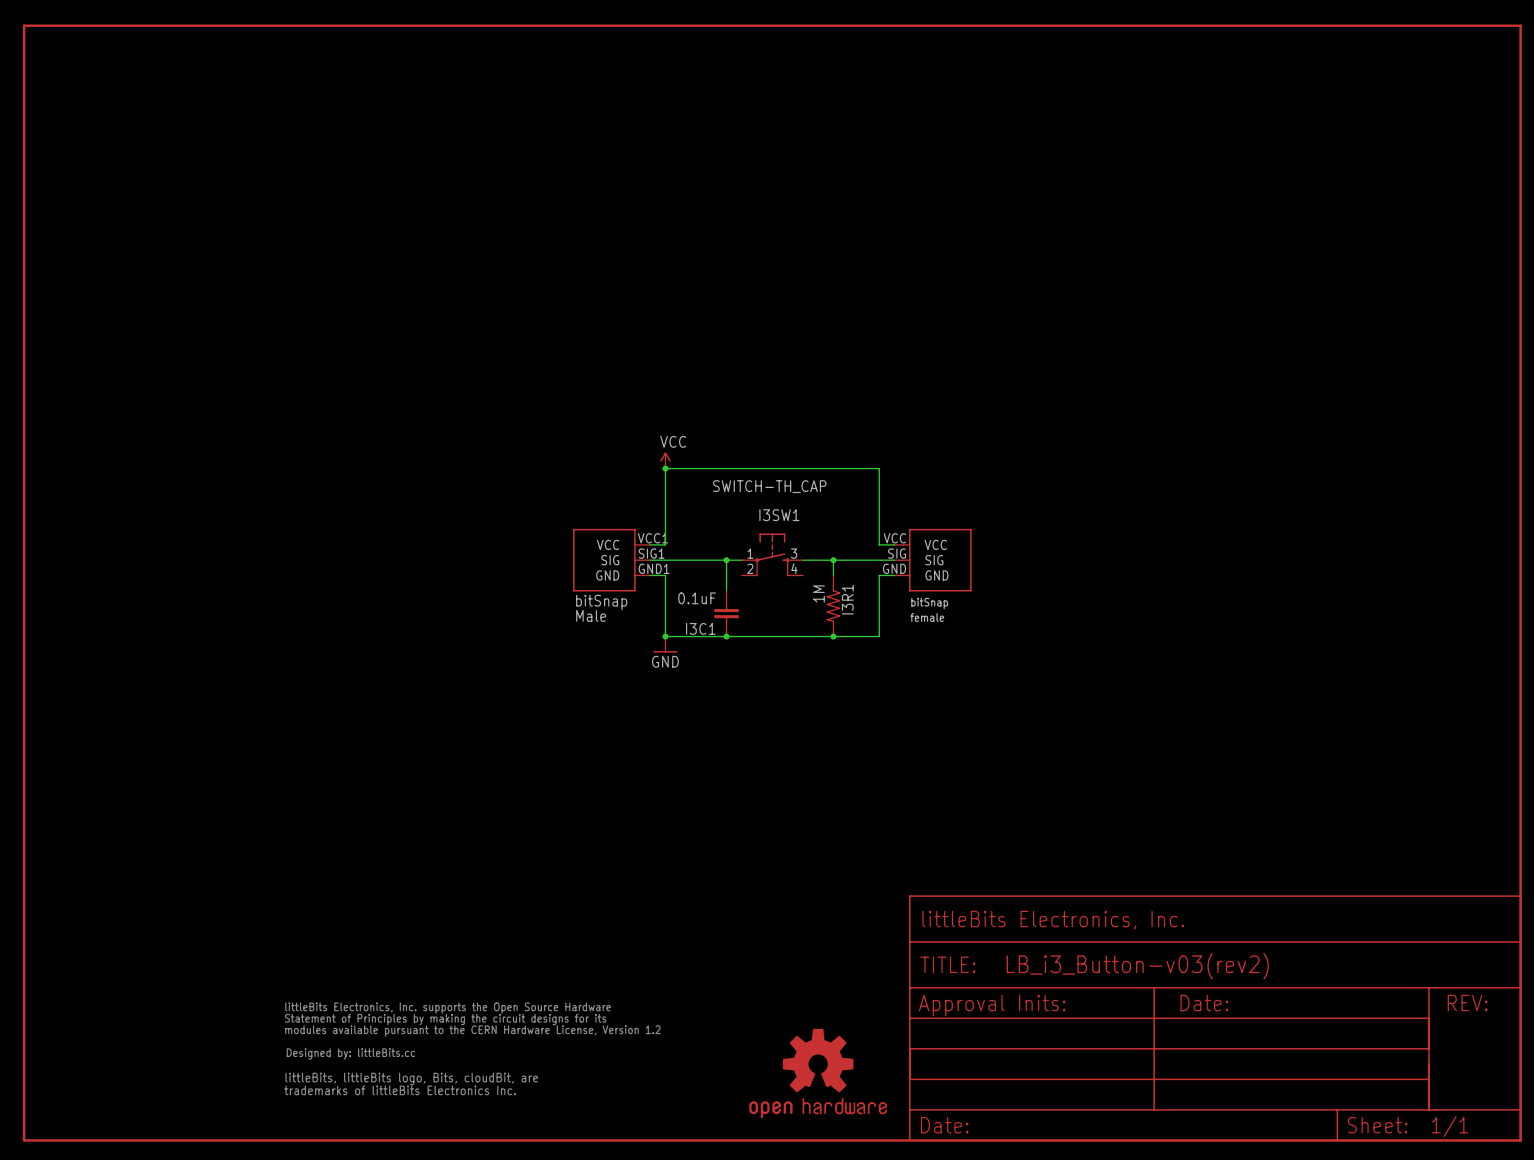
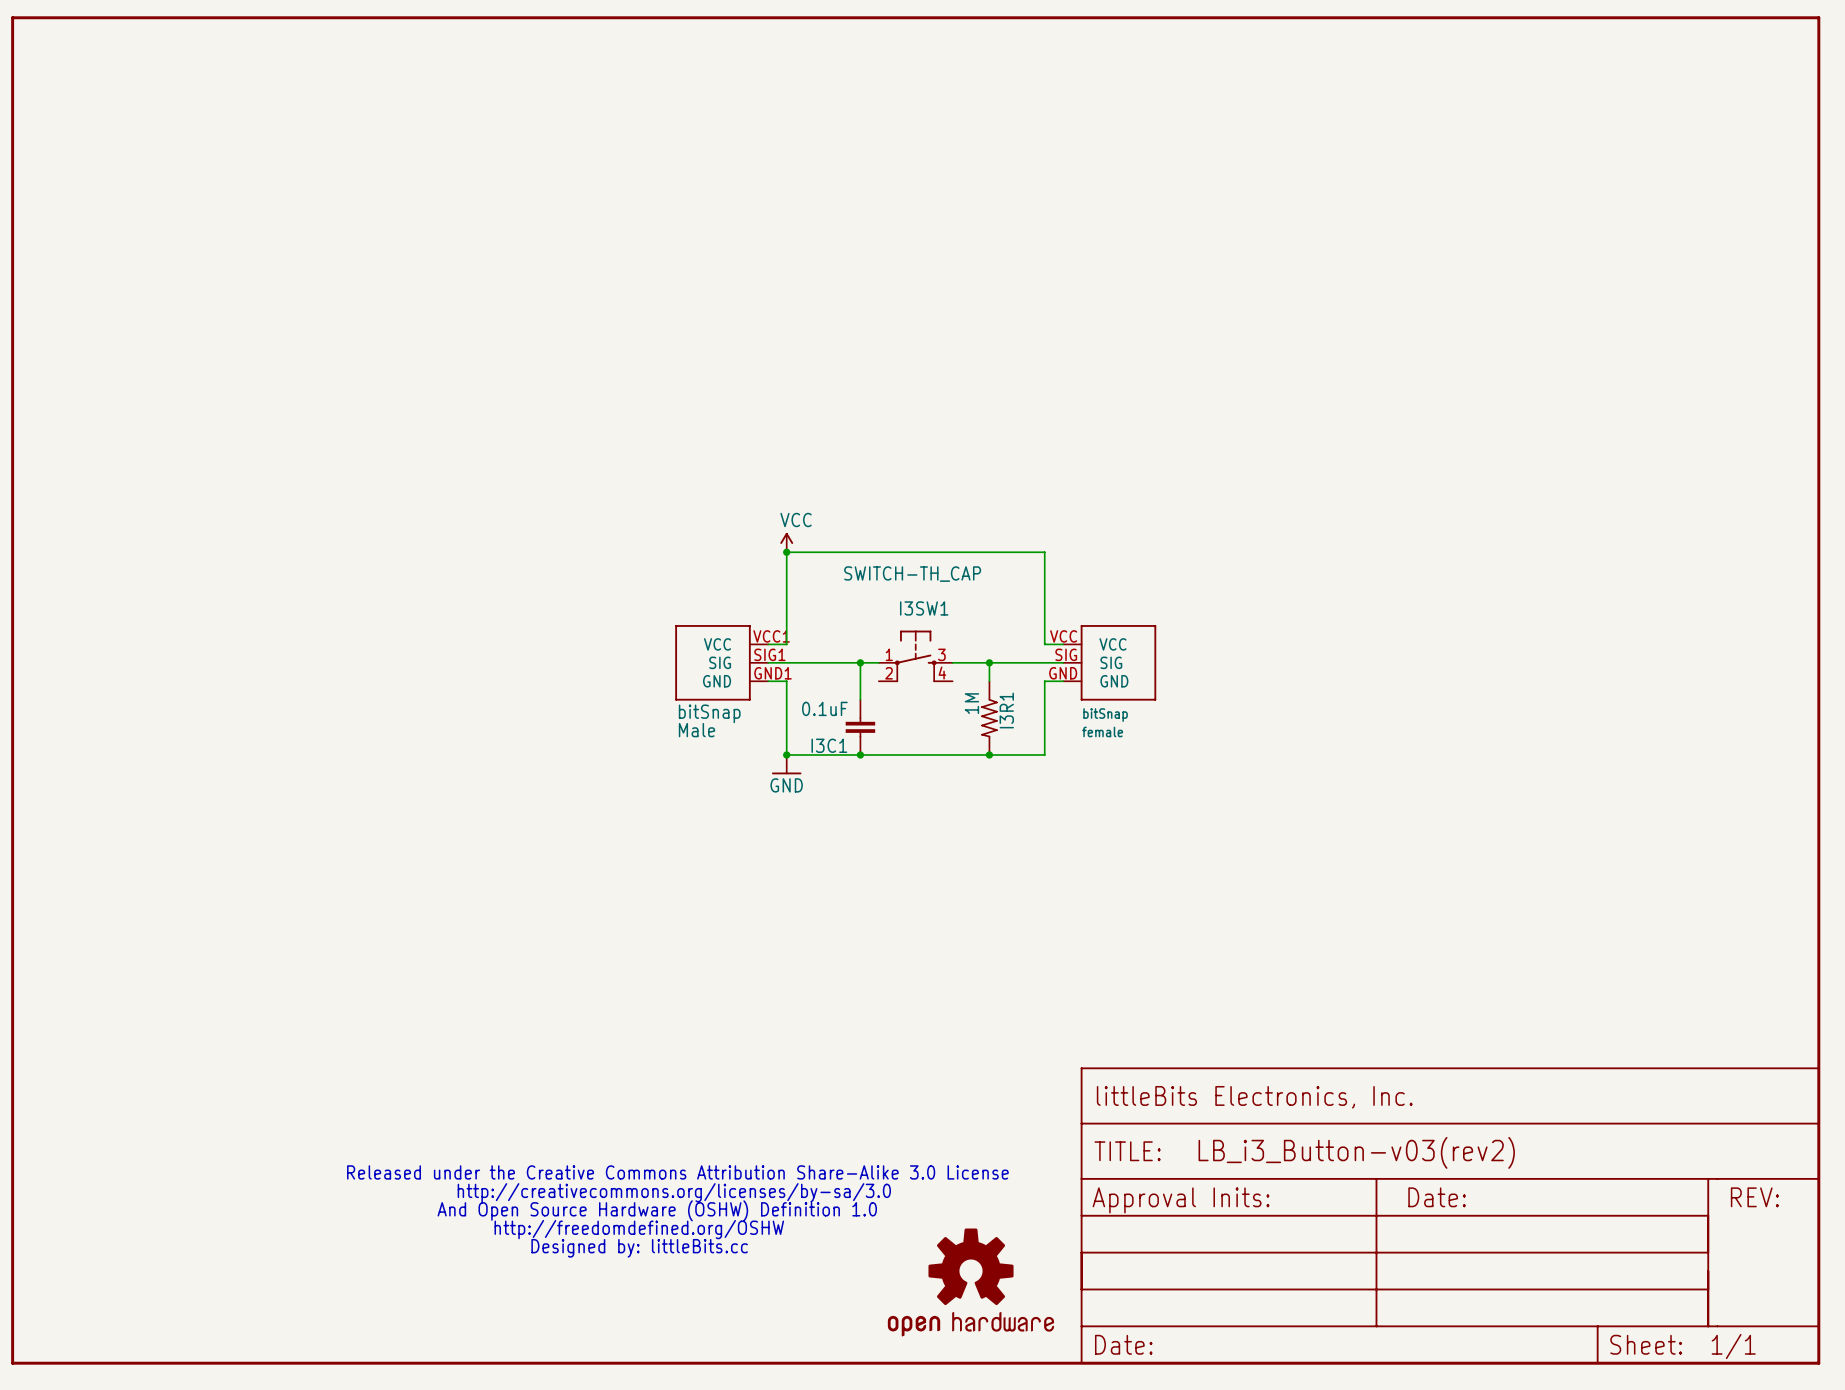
part: none -> (677, 1211)
part: (472, 1048) -> none

